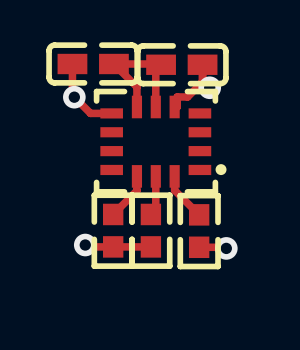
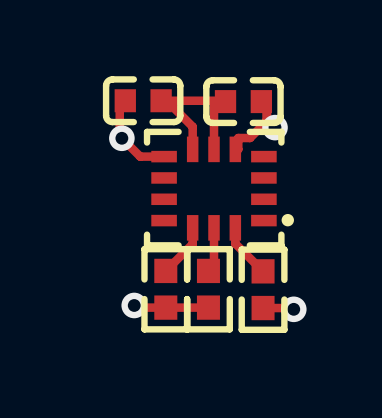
part footprint: [46, 42, 141, 86] -> [102, 76, 184, 126]
part footprint: [134, 43, 229, 87] -> [203, 77, 284, 127]

